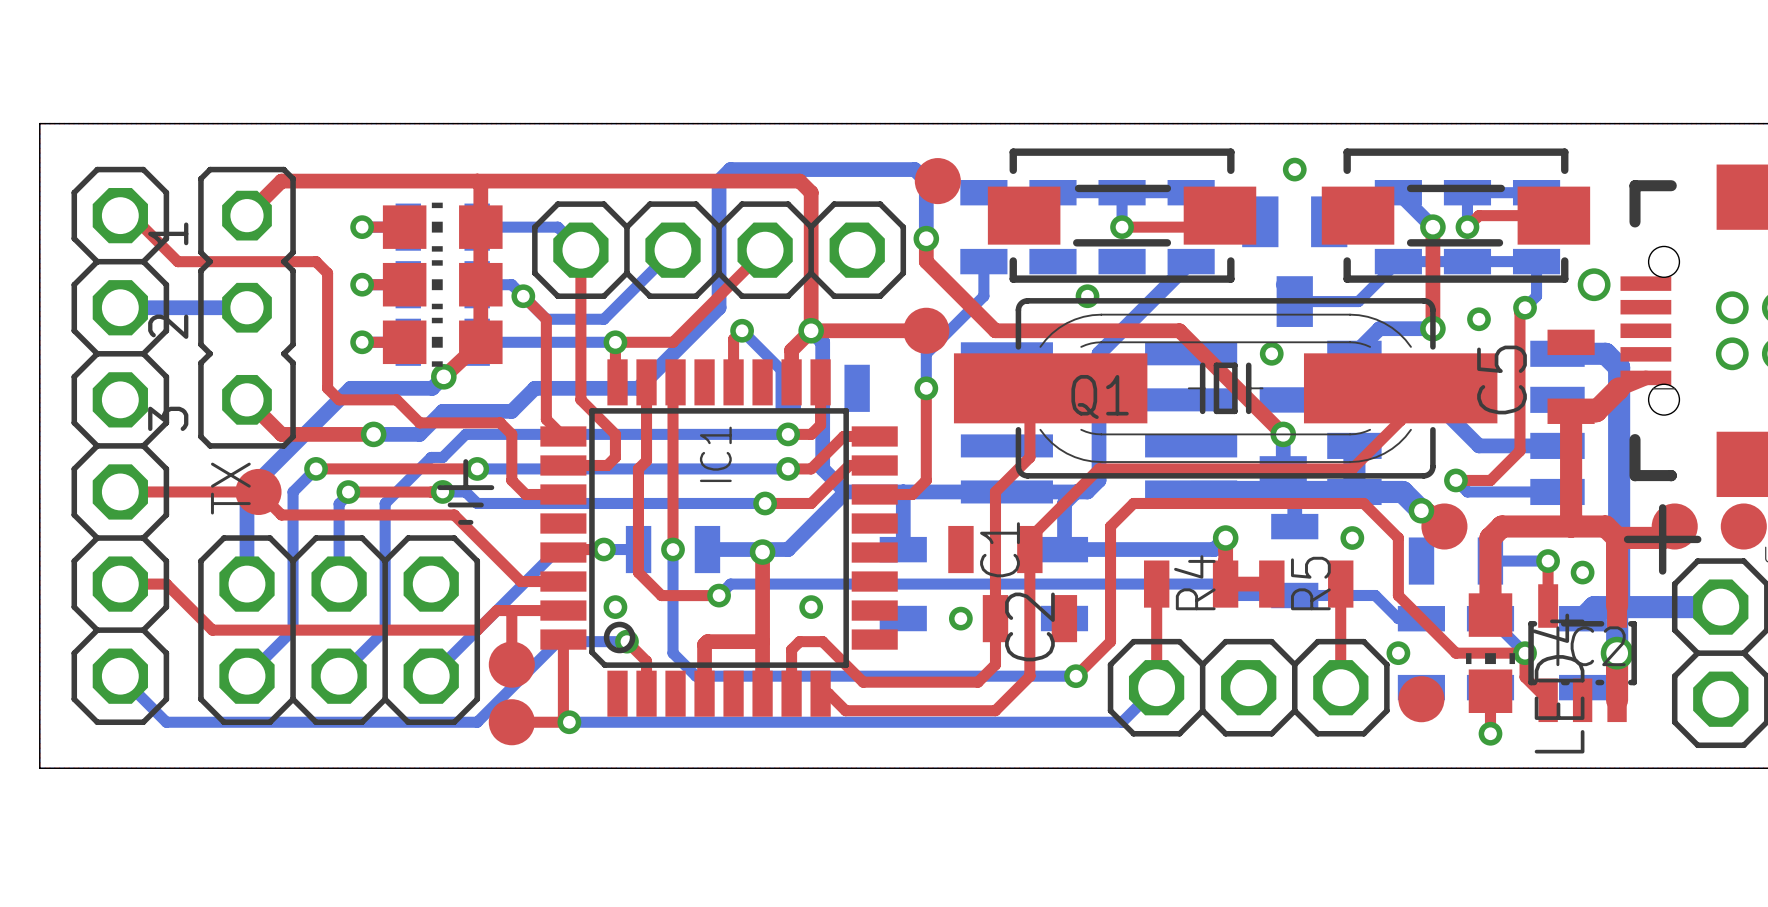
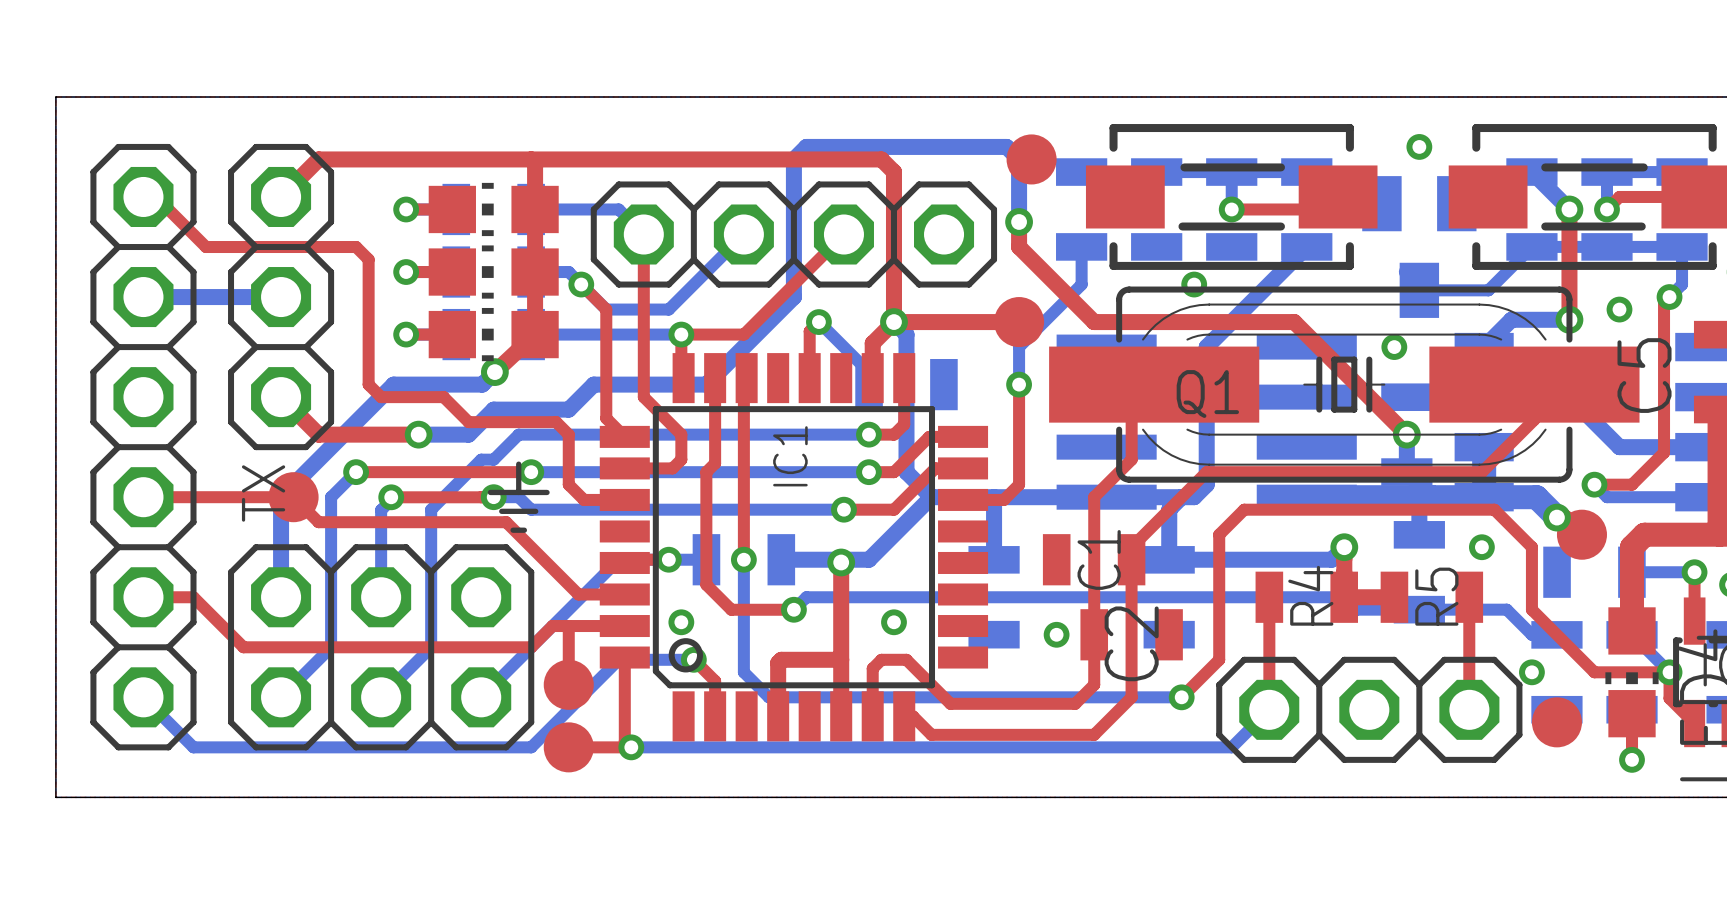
part footprint: [198, 166, 296, 449] -> [228, 143, 335, 451]

